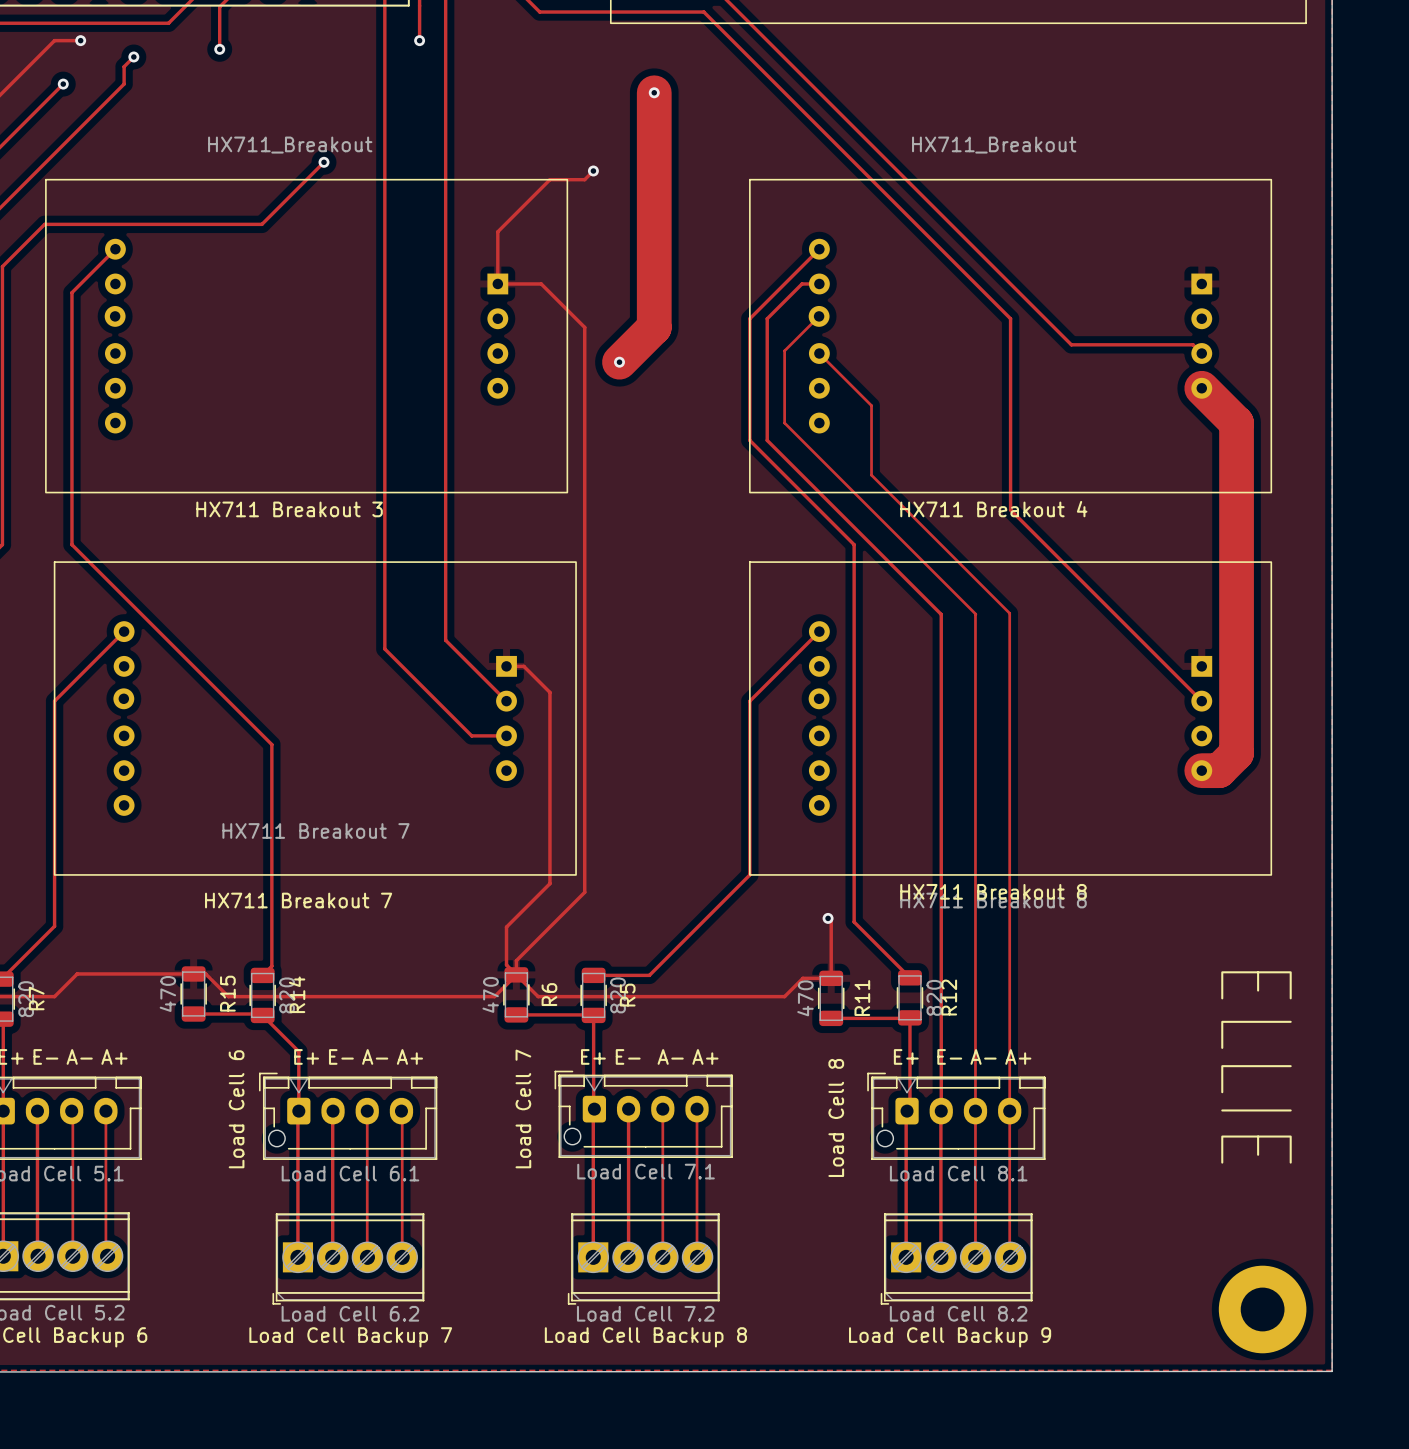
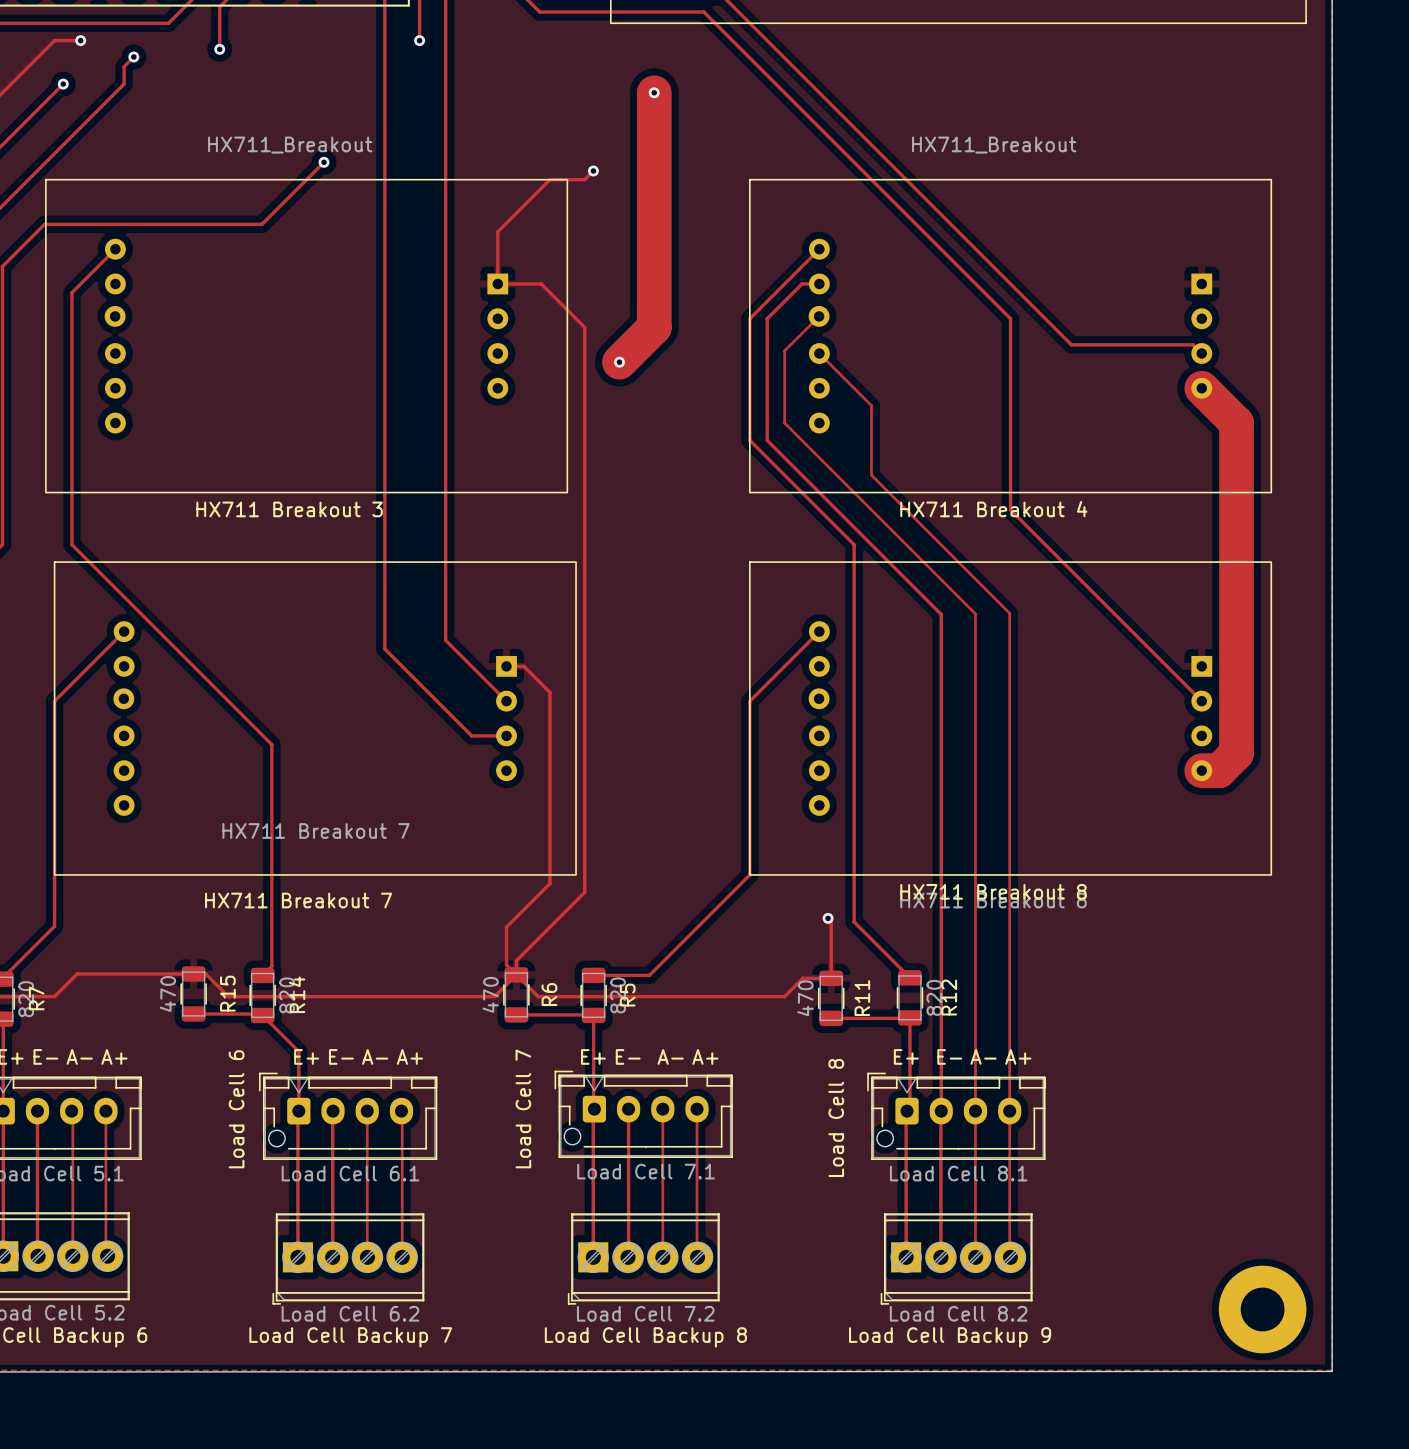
text: ELLIE (1256, 1067) -> none

